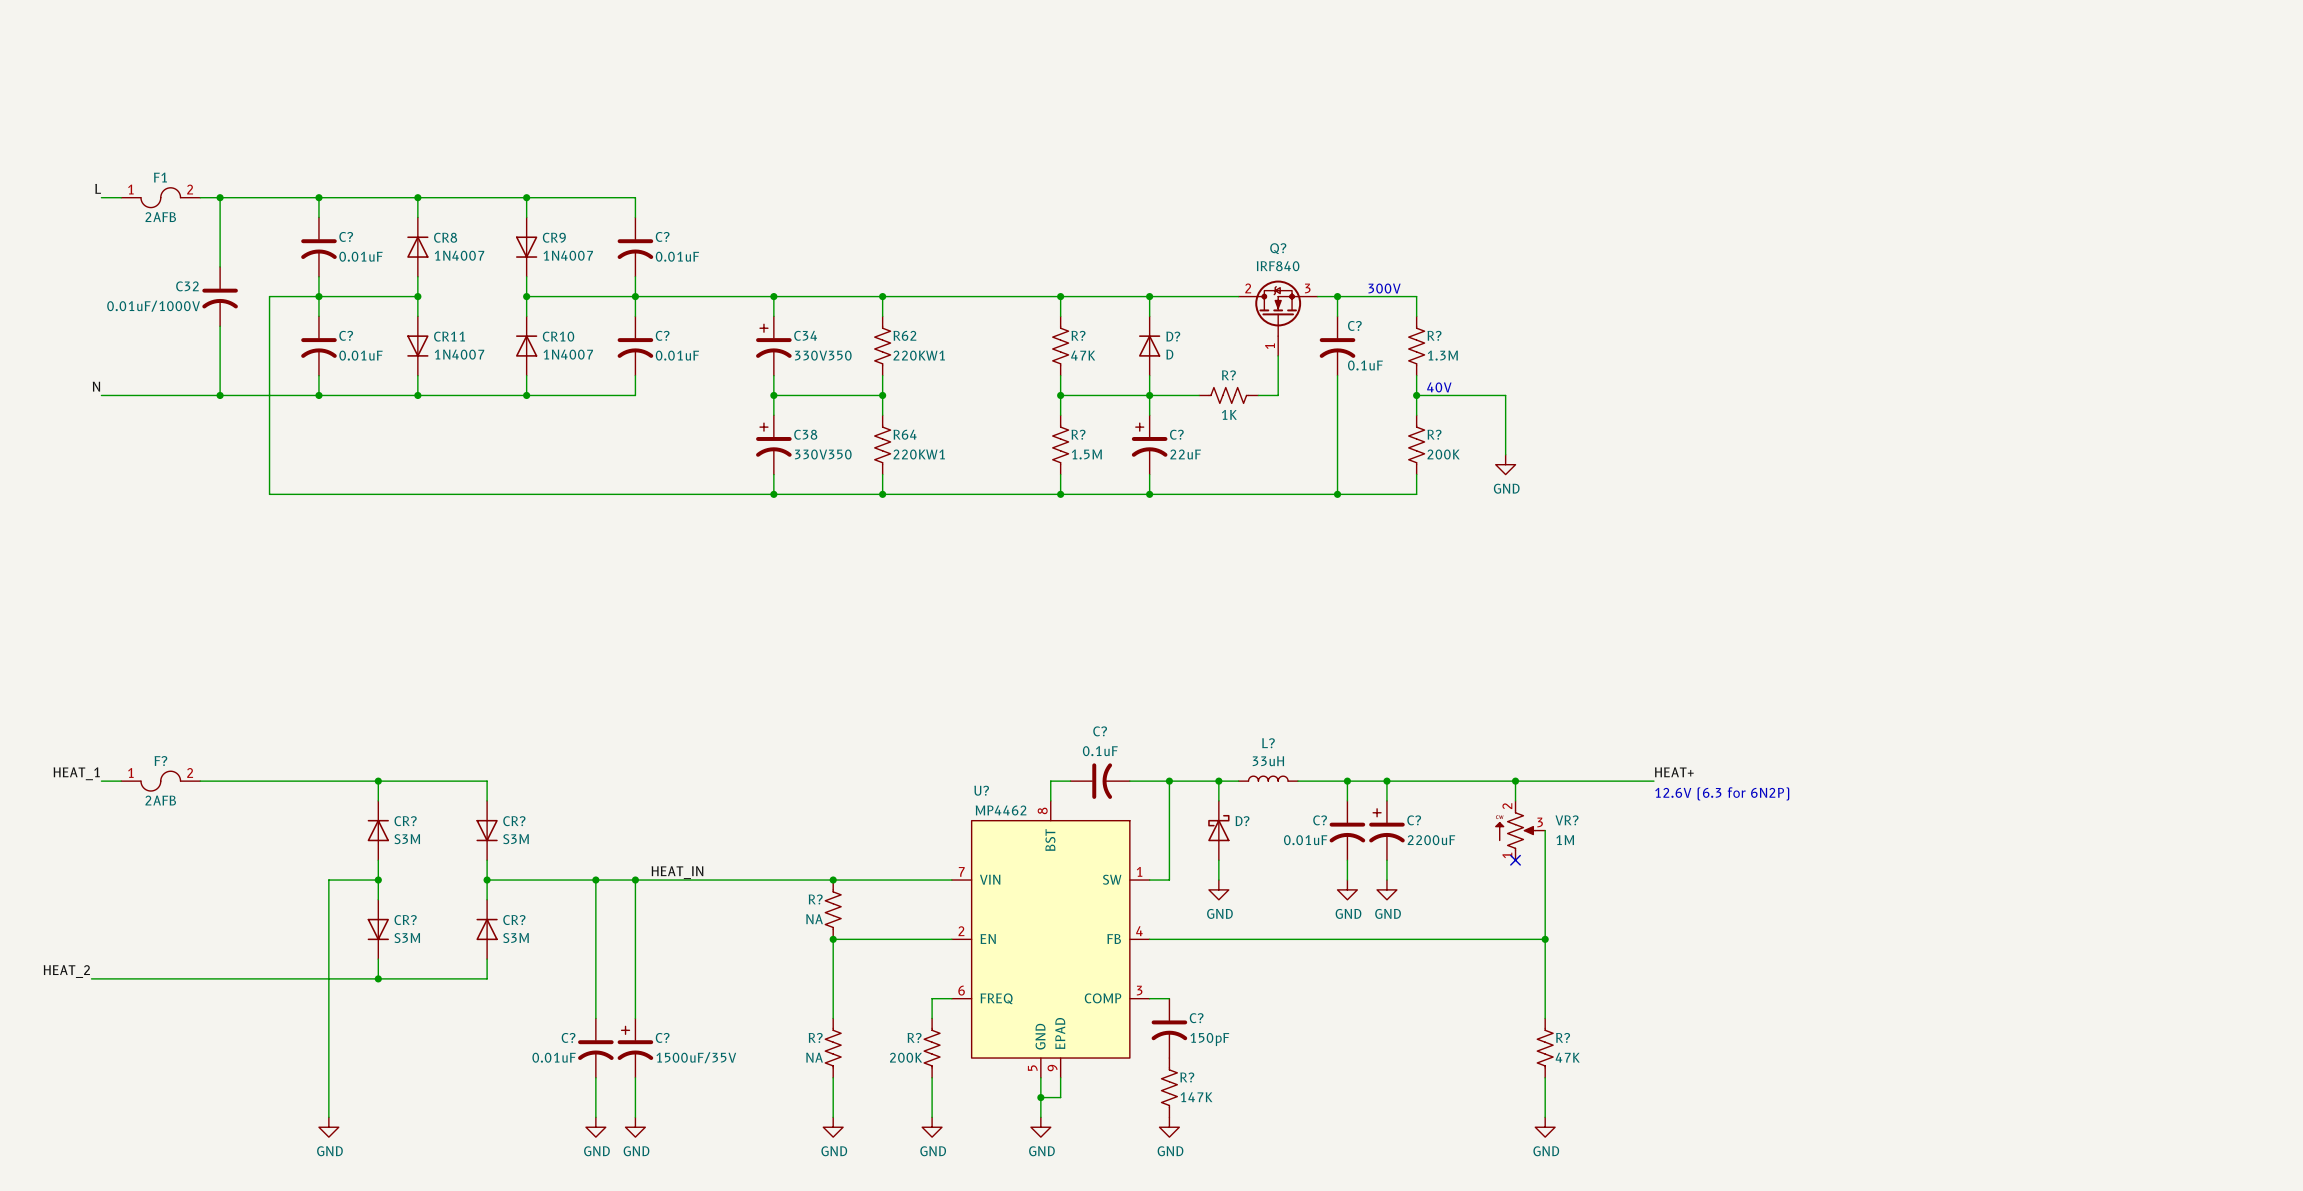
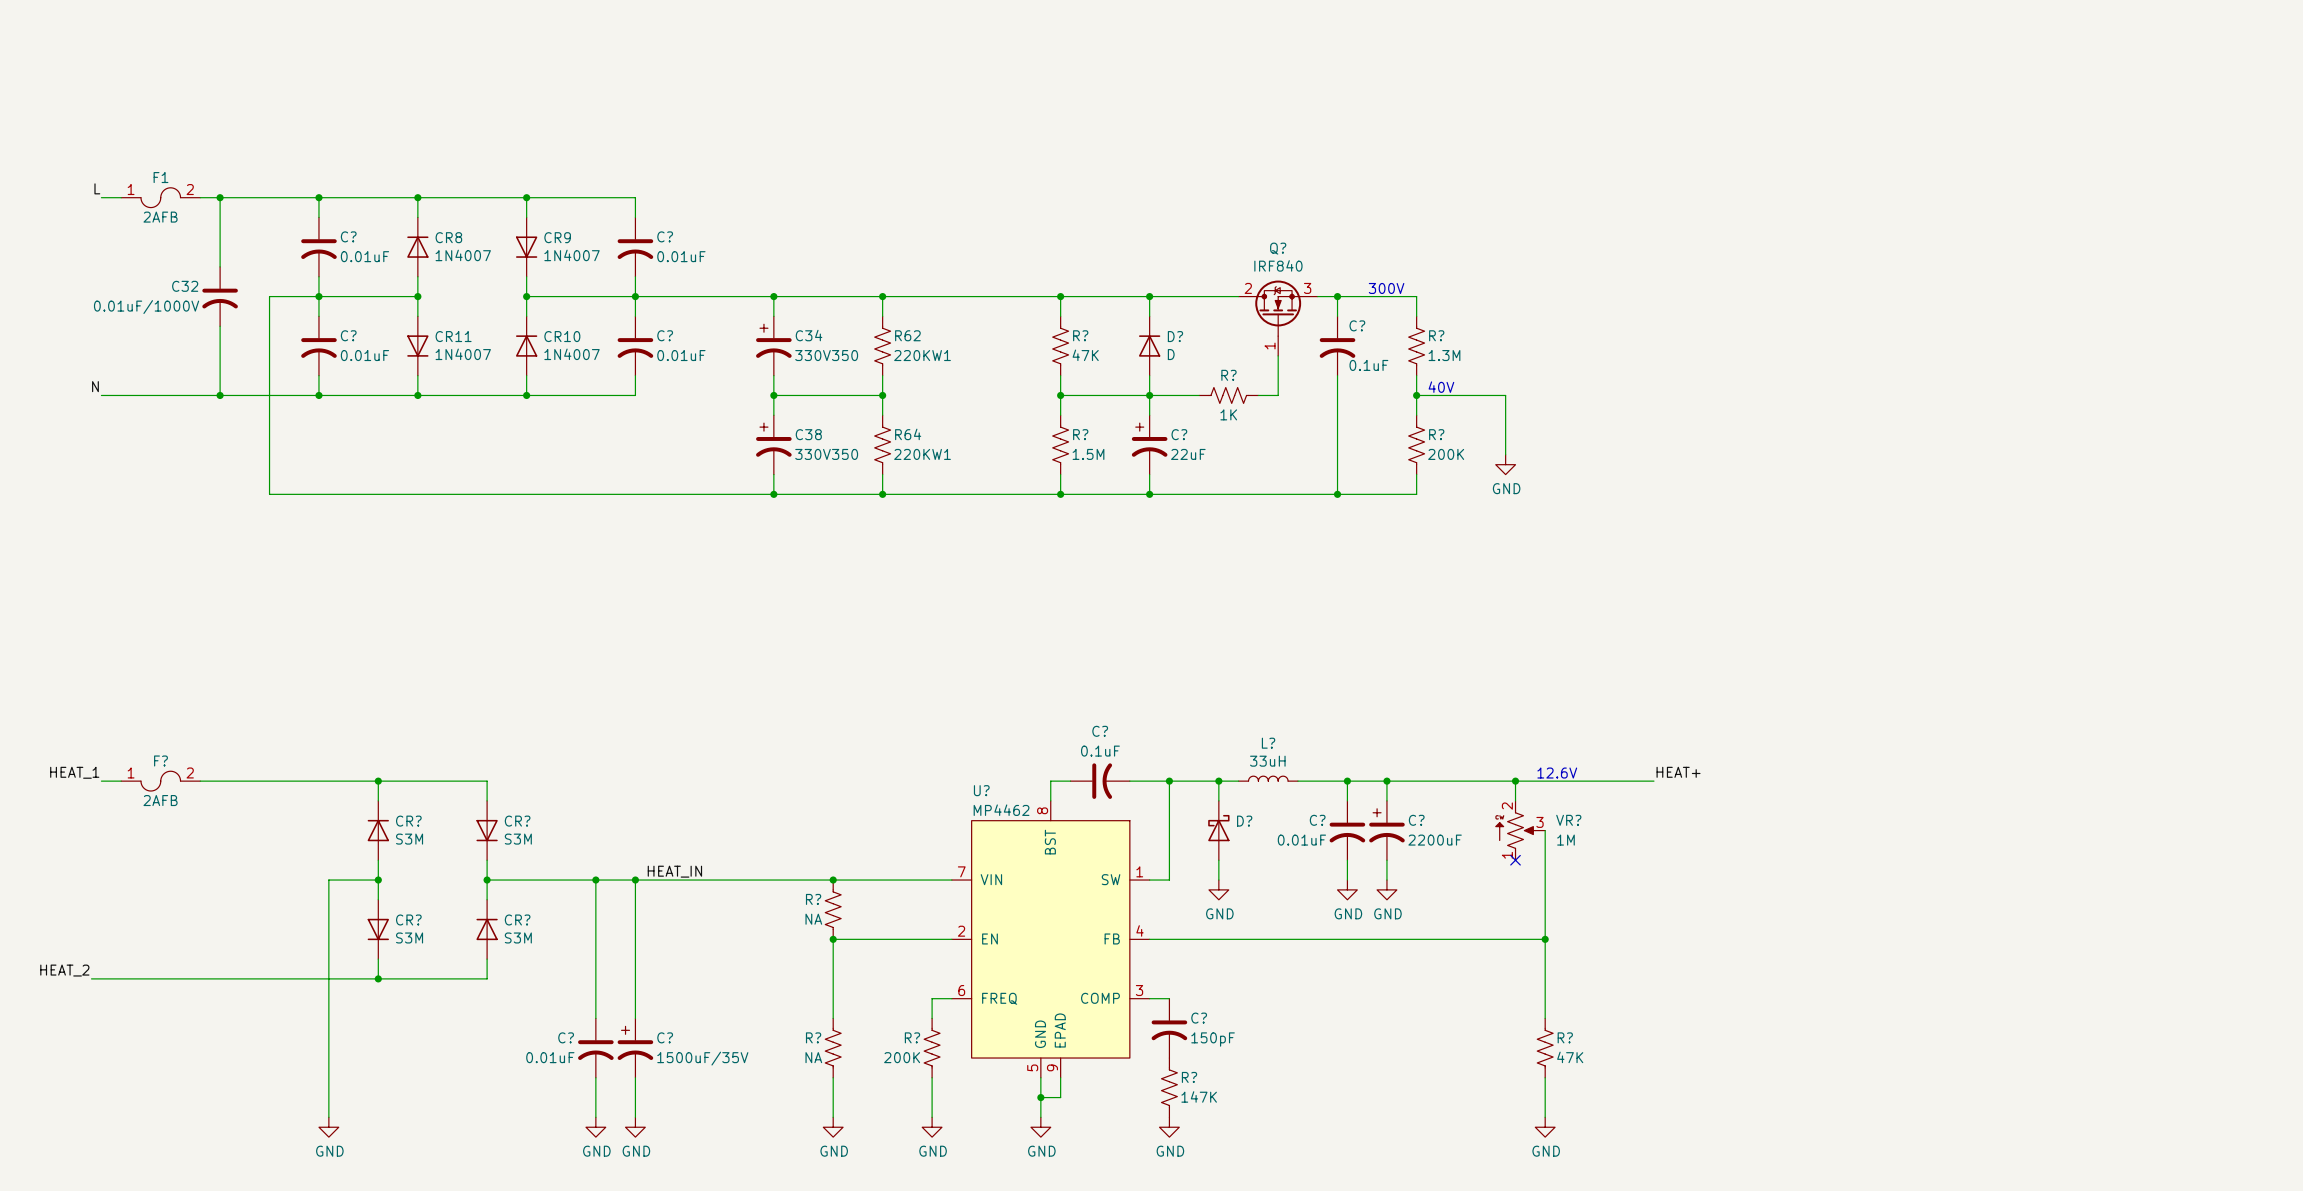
text: none -> 12.6V (1557, 773)
text: 12.6V (6.3 for 6N2P) (1722, 793) -> none

